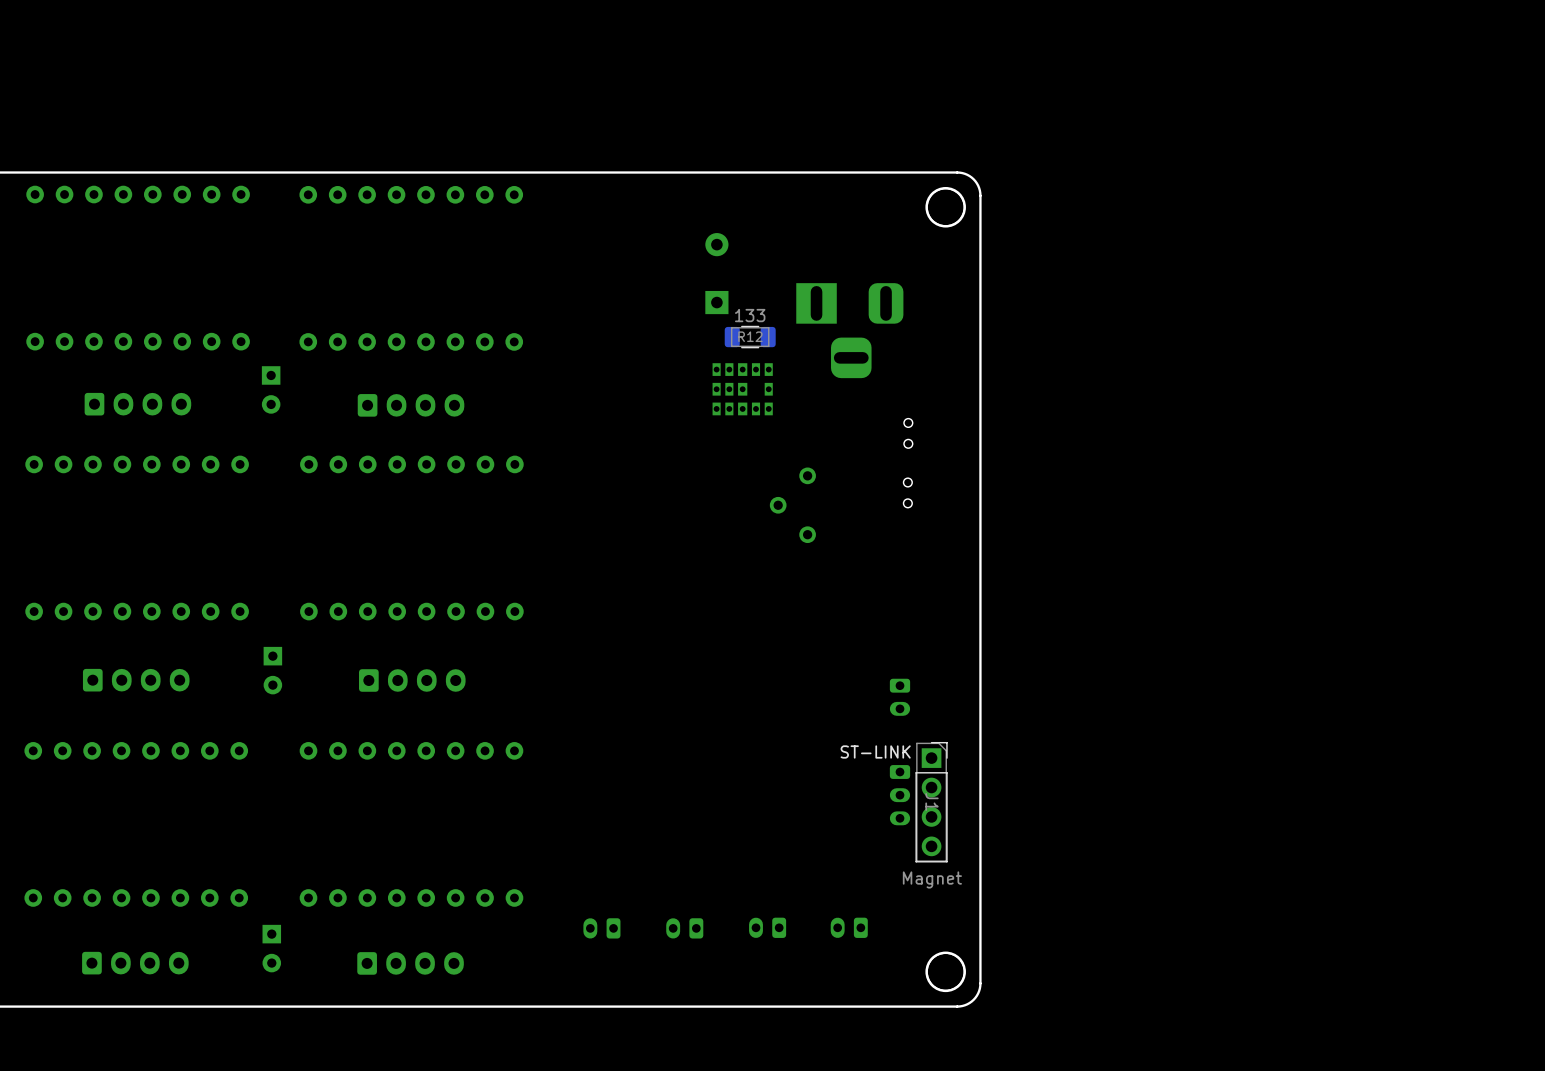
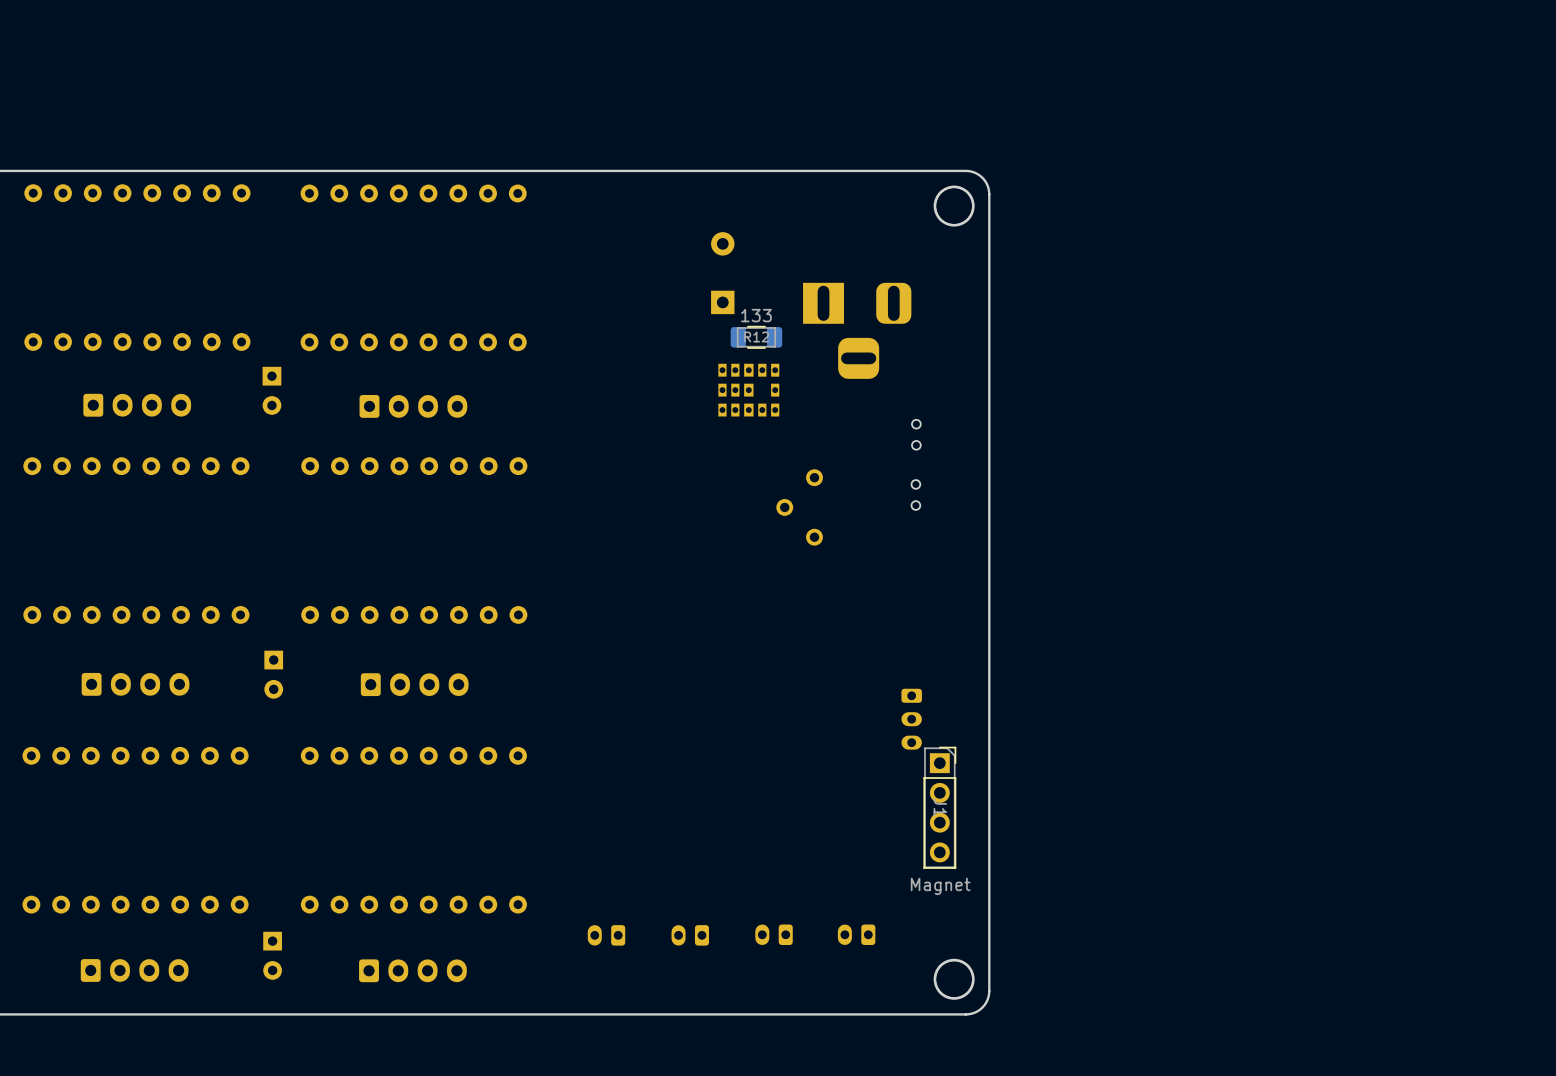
part: (899, 697) -> none
text: ST-LINK (875, 751) -> none
part position: (899, 795) -> (911, 719)

